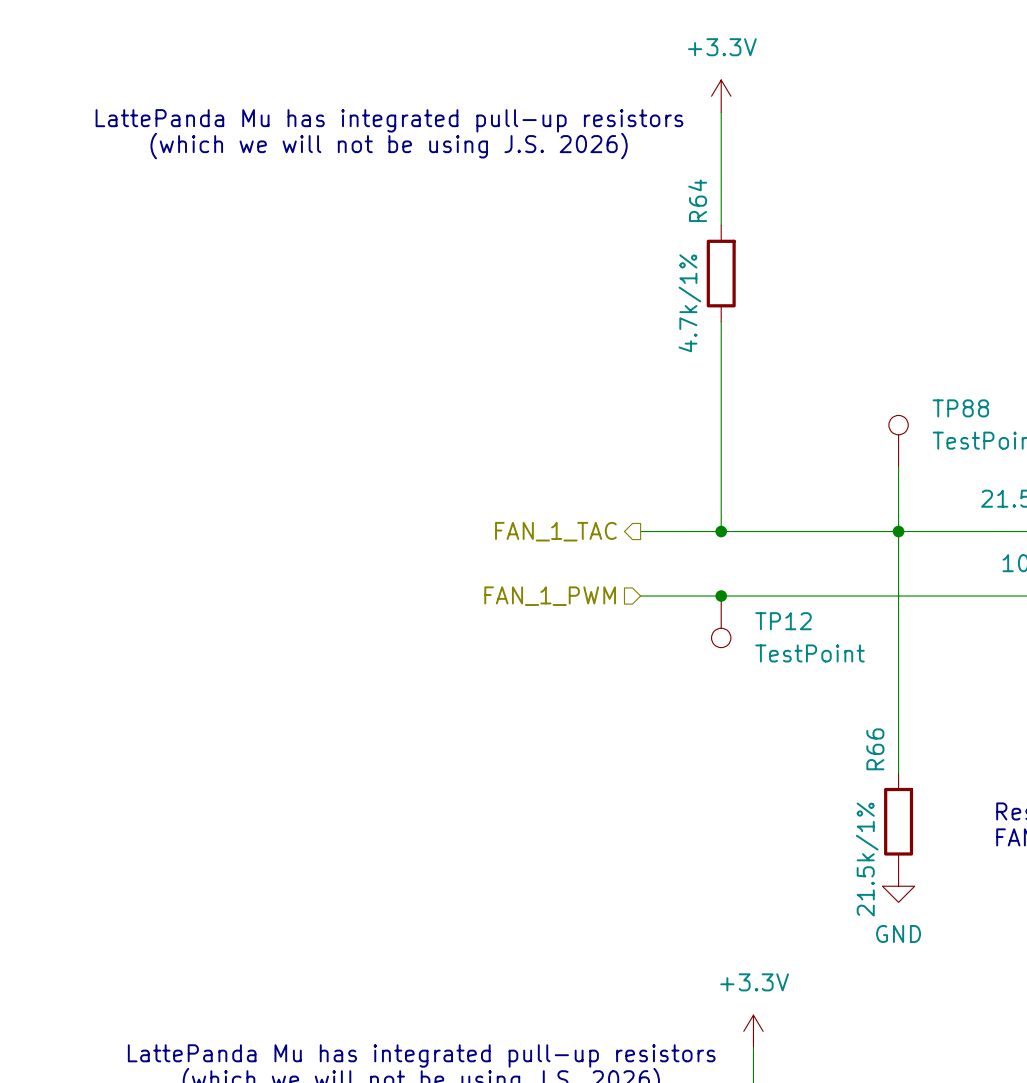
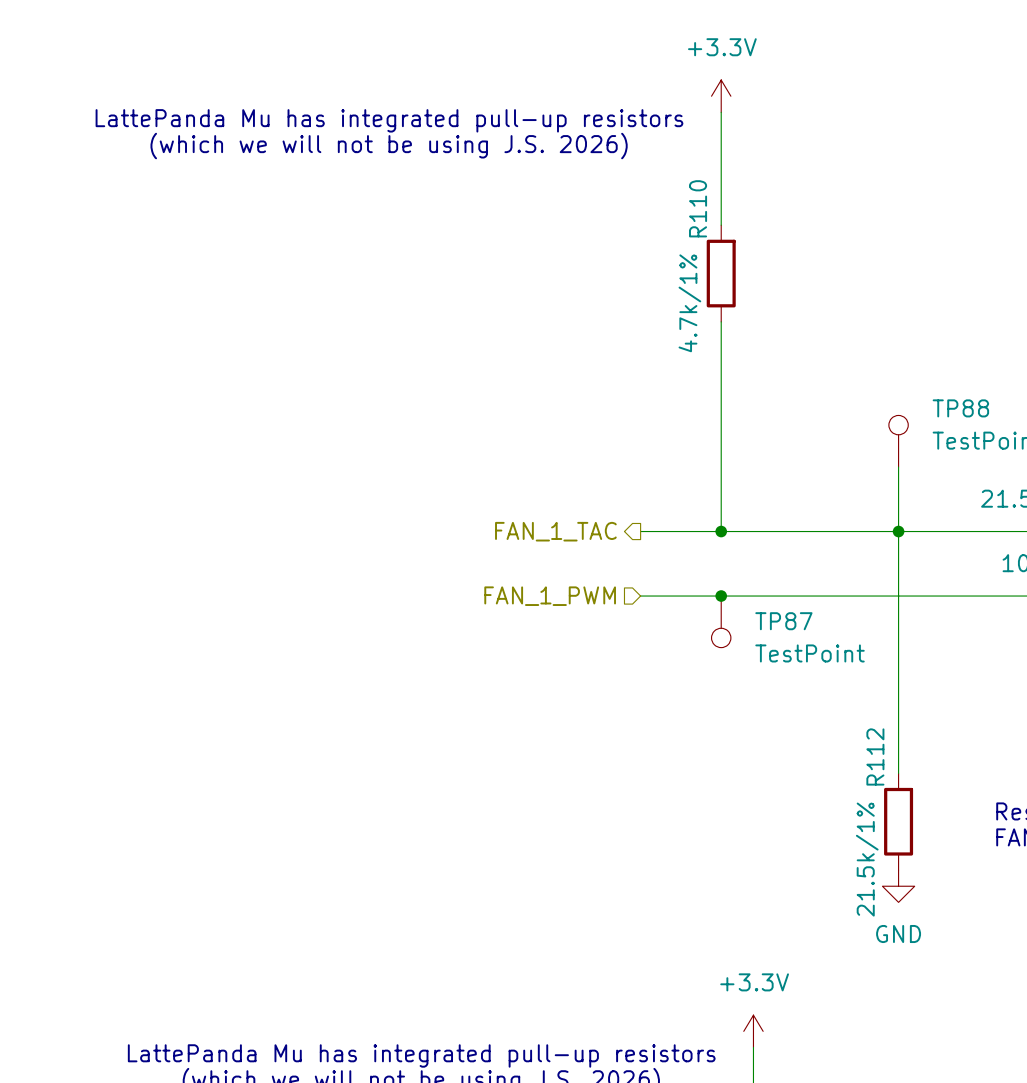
R64 name: R64 (697, 200) -> R110 (698, 208)
TP12 name: TP12 (783, 621) -> TP87 (783, 621)
R66 name: R66 (875, 749) -> R112 (875, 756)

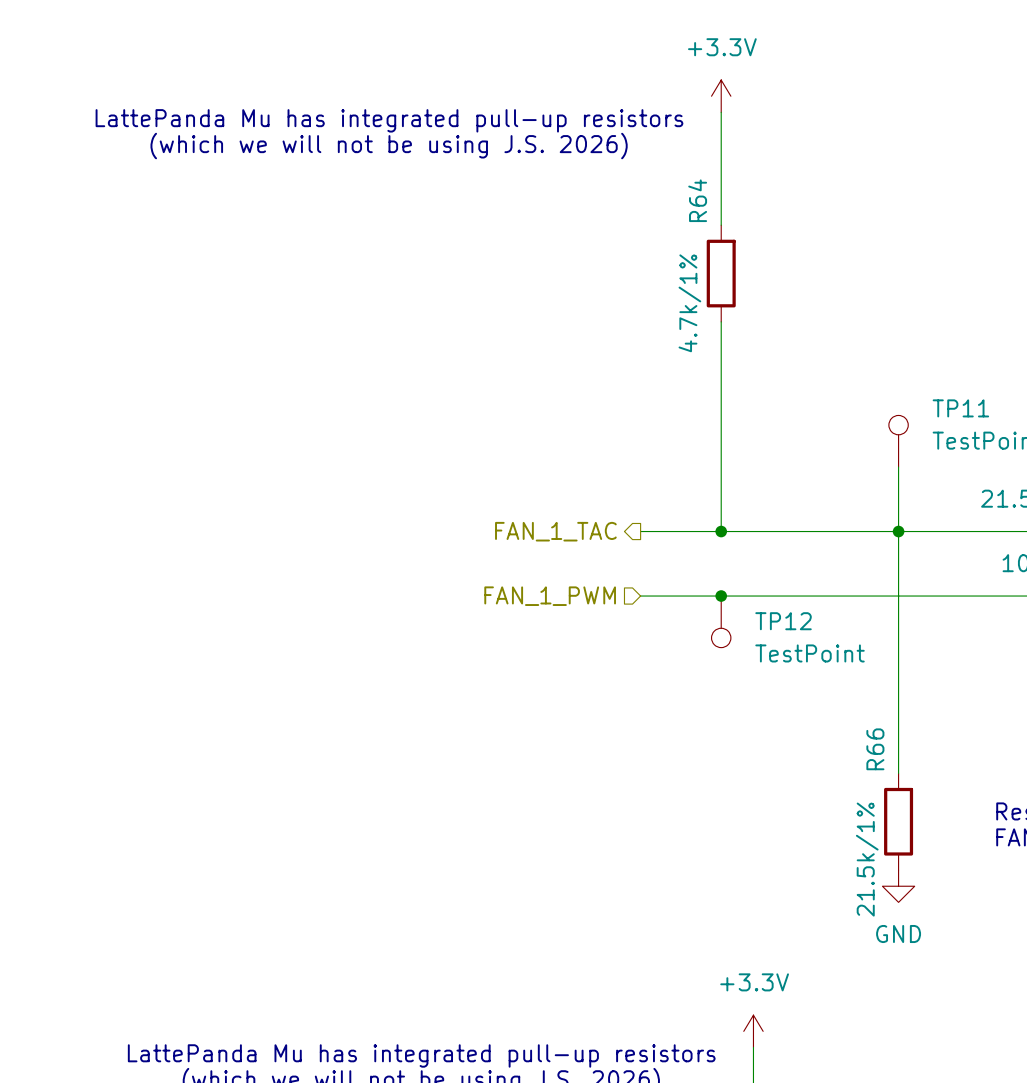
R110 name: R110 (698, 208) -> R64 (697, 200)
TP88 name: TP88 (960, 408) -> TP11 (960, 408)
TP87 name: TP87 (783, 621) -> TP12 (783, 621)
R112 name: R112 (875, 756) -> R66 (875, 749)

